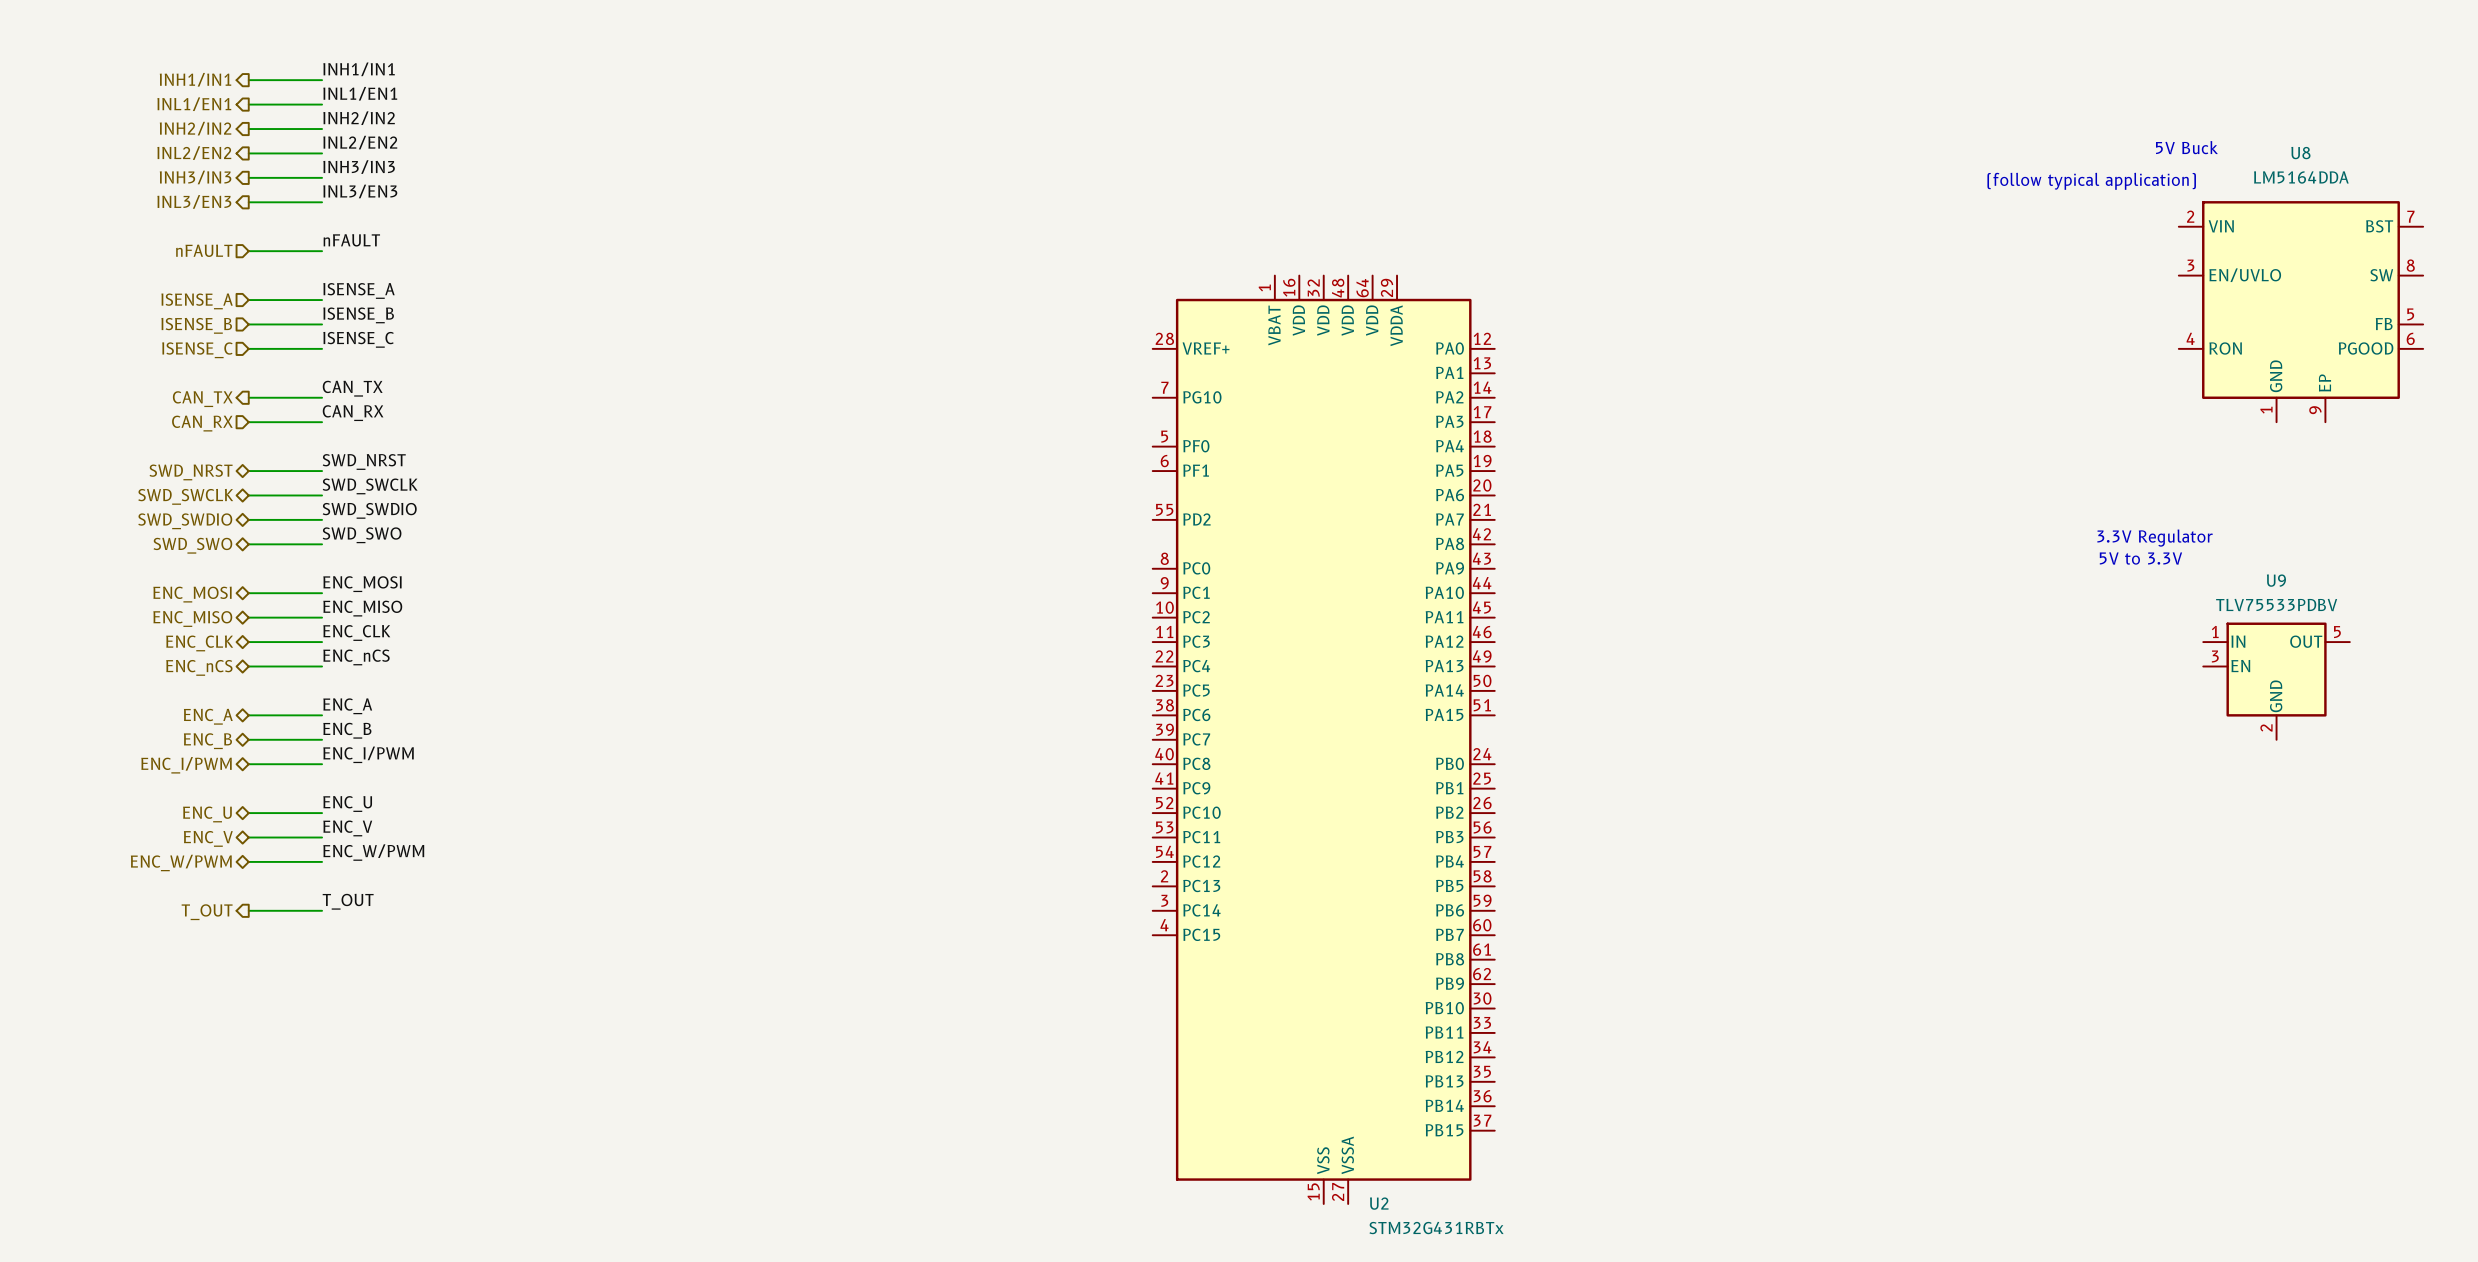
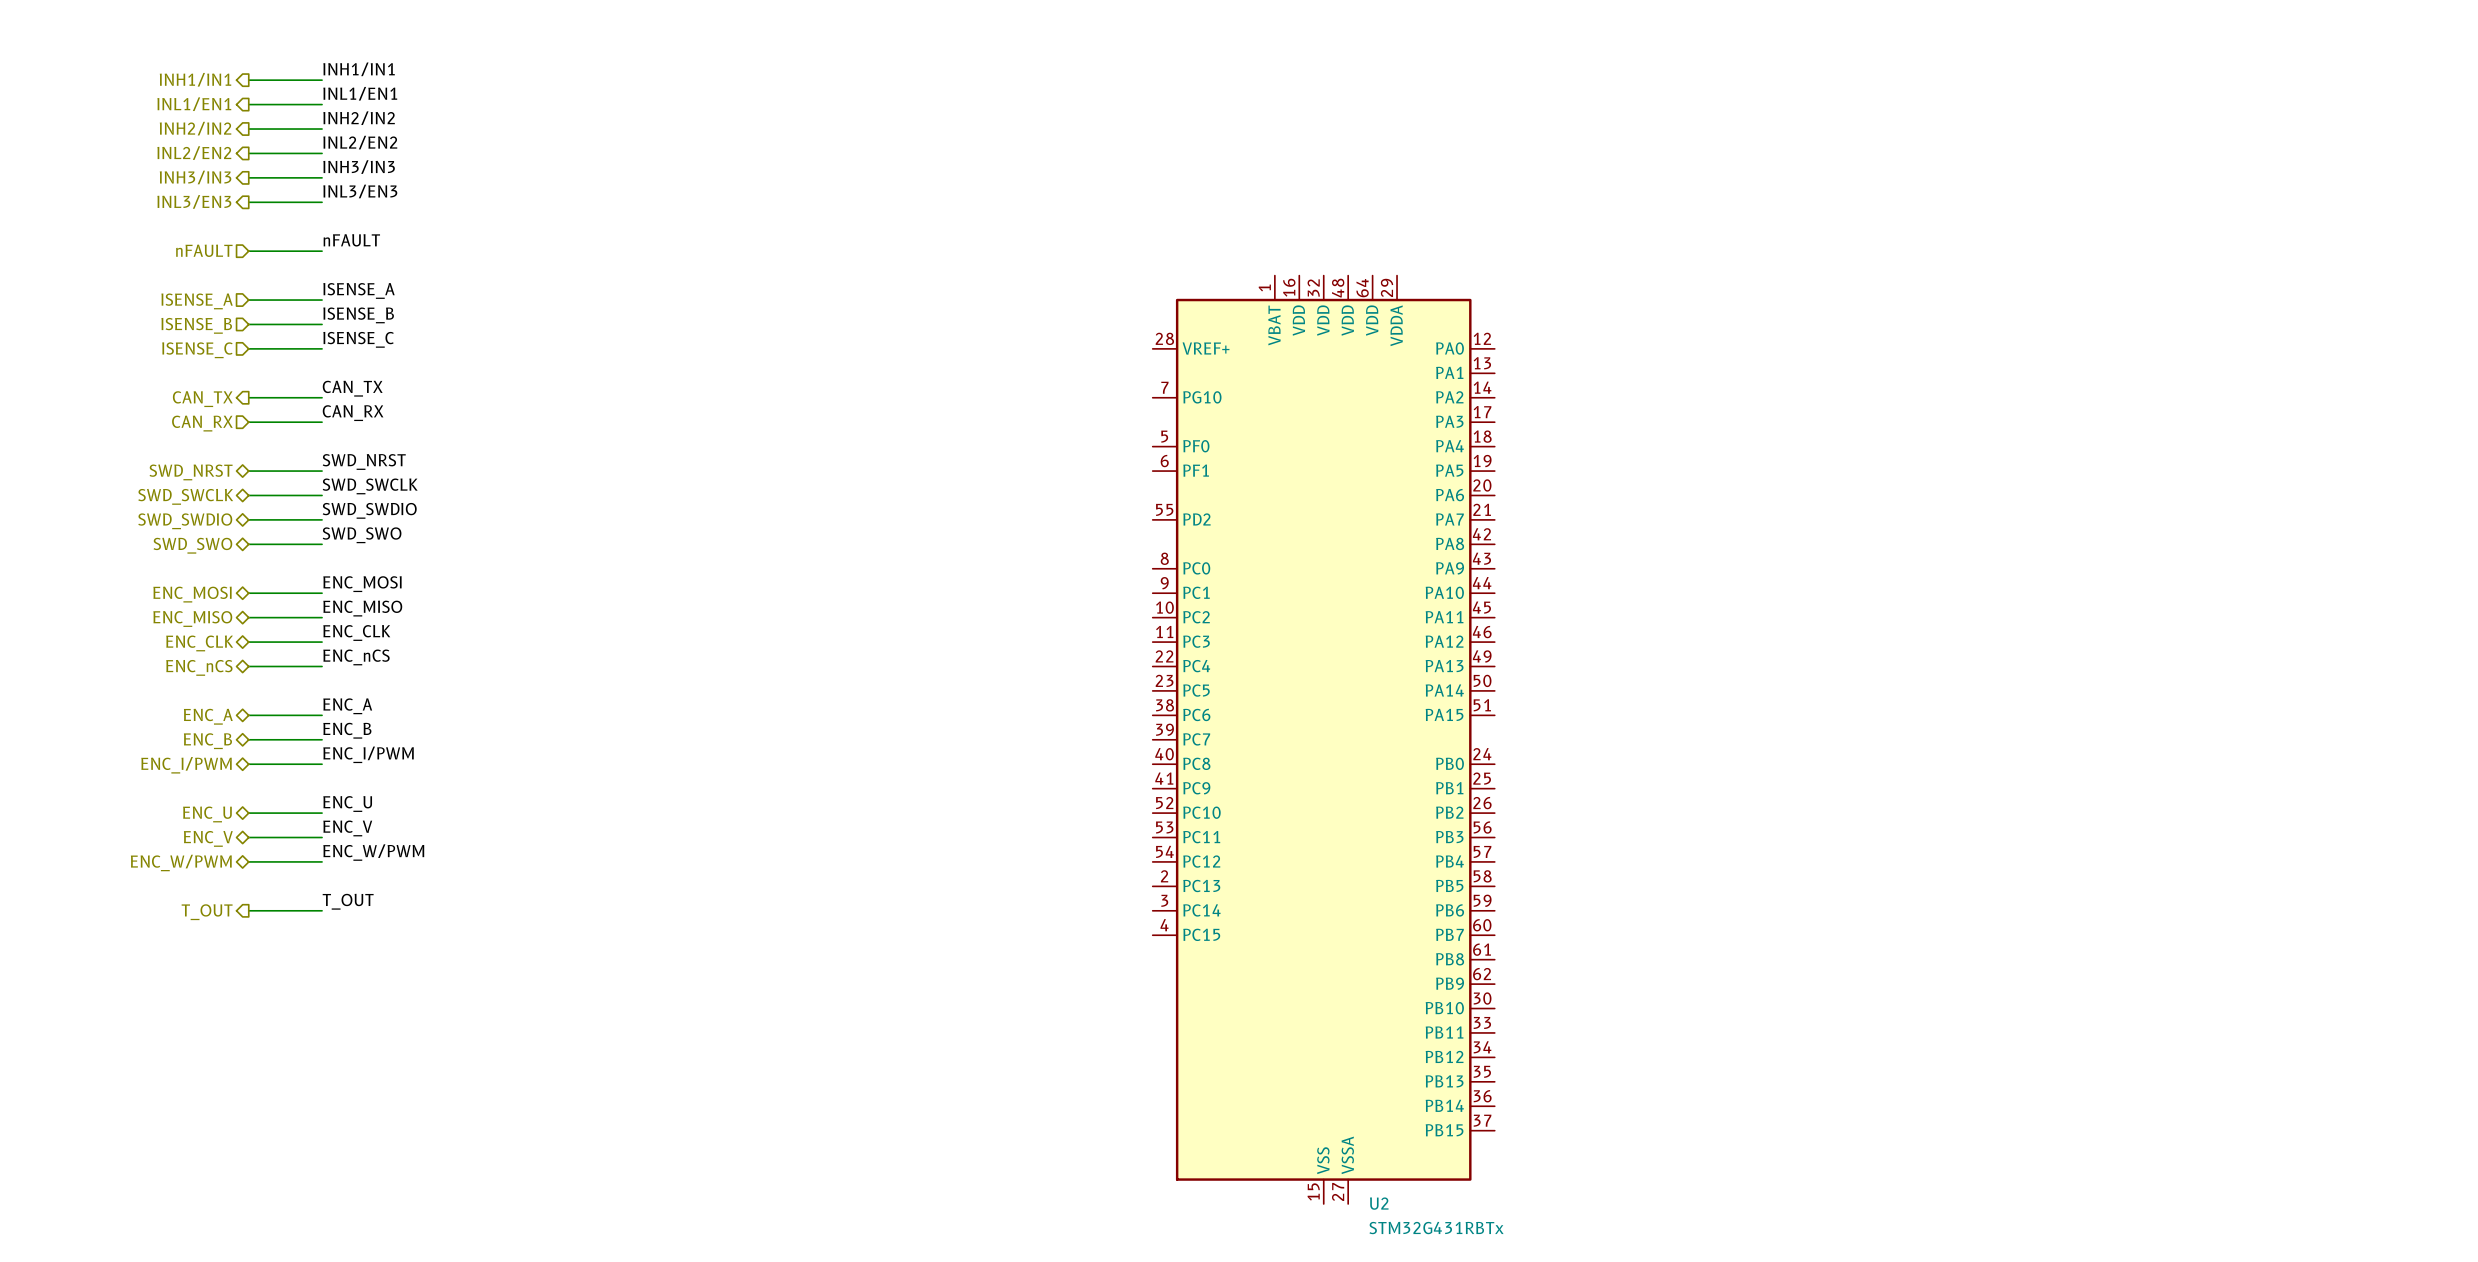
text: 5V Buck (2186, 147) -> none
text: (follow typical application) (2091, 181) -> none
U8: LM5164DDA (2300, 311) -> none
text: 3.3V Regulator (2155, 538) -> none
text: 5V to 3.3V (2140, 558) -> none
U9: TLV75533PDBV (2276, 681) -> none

